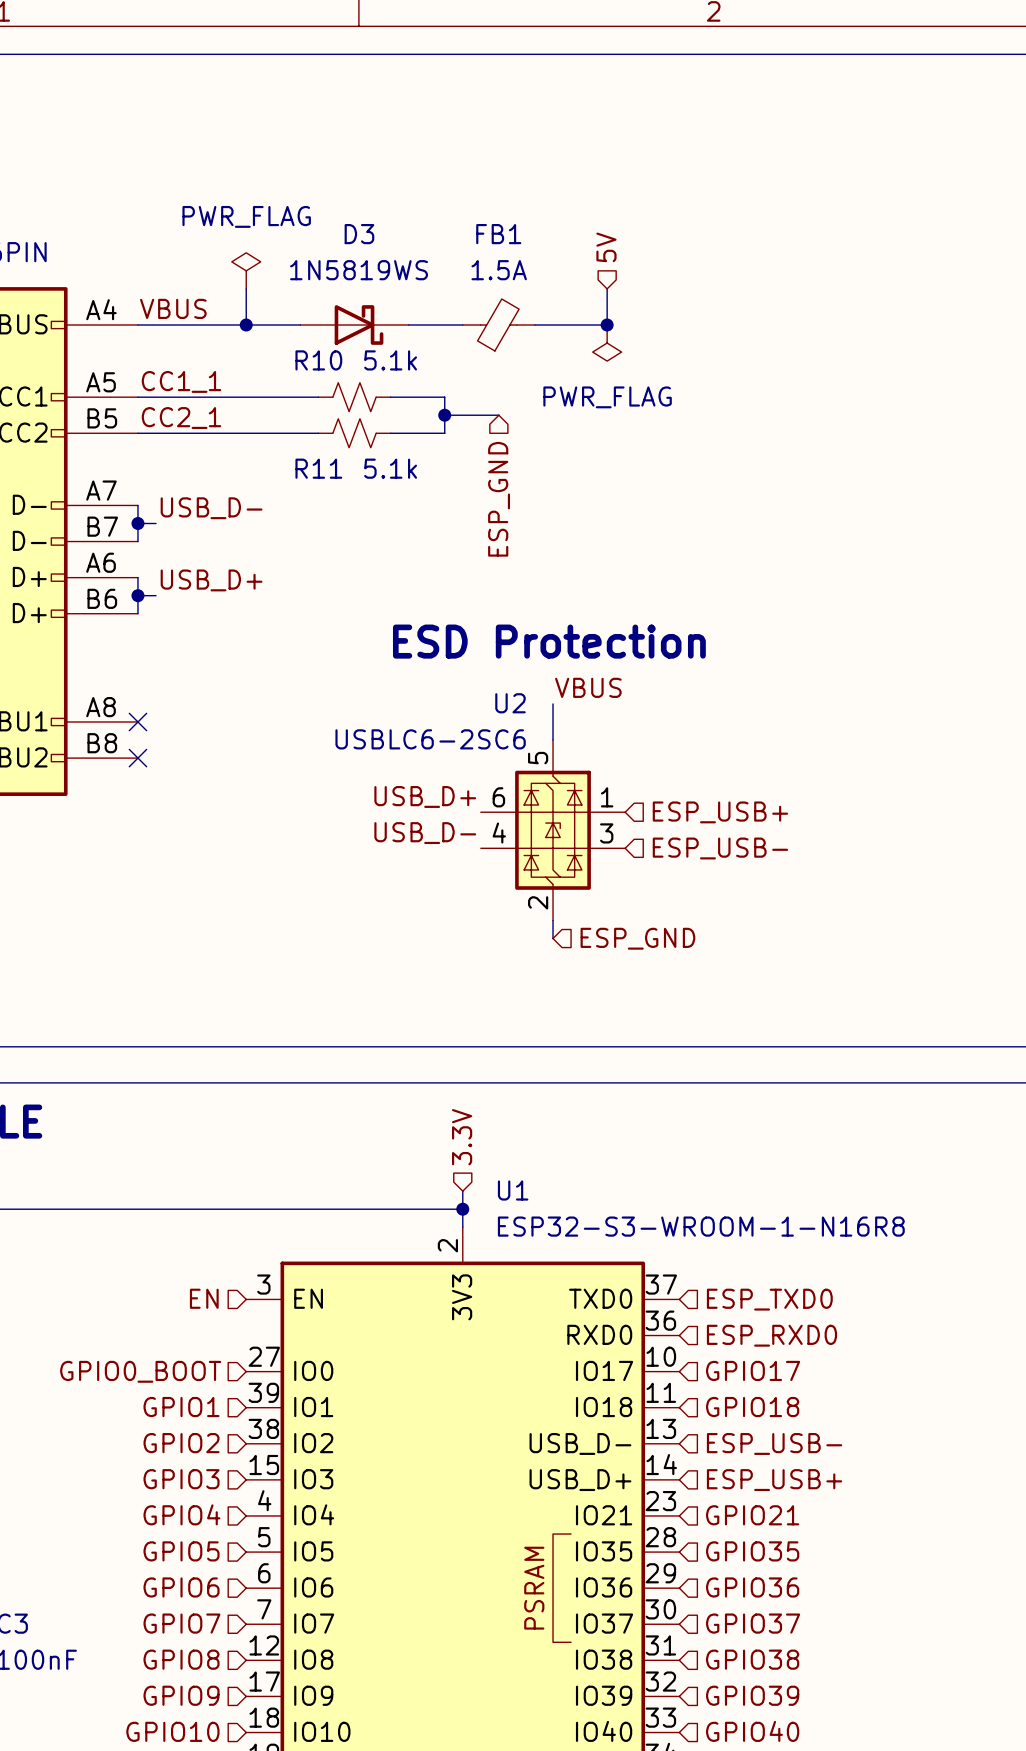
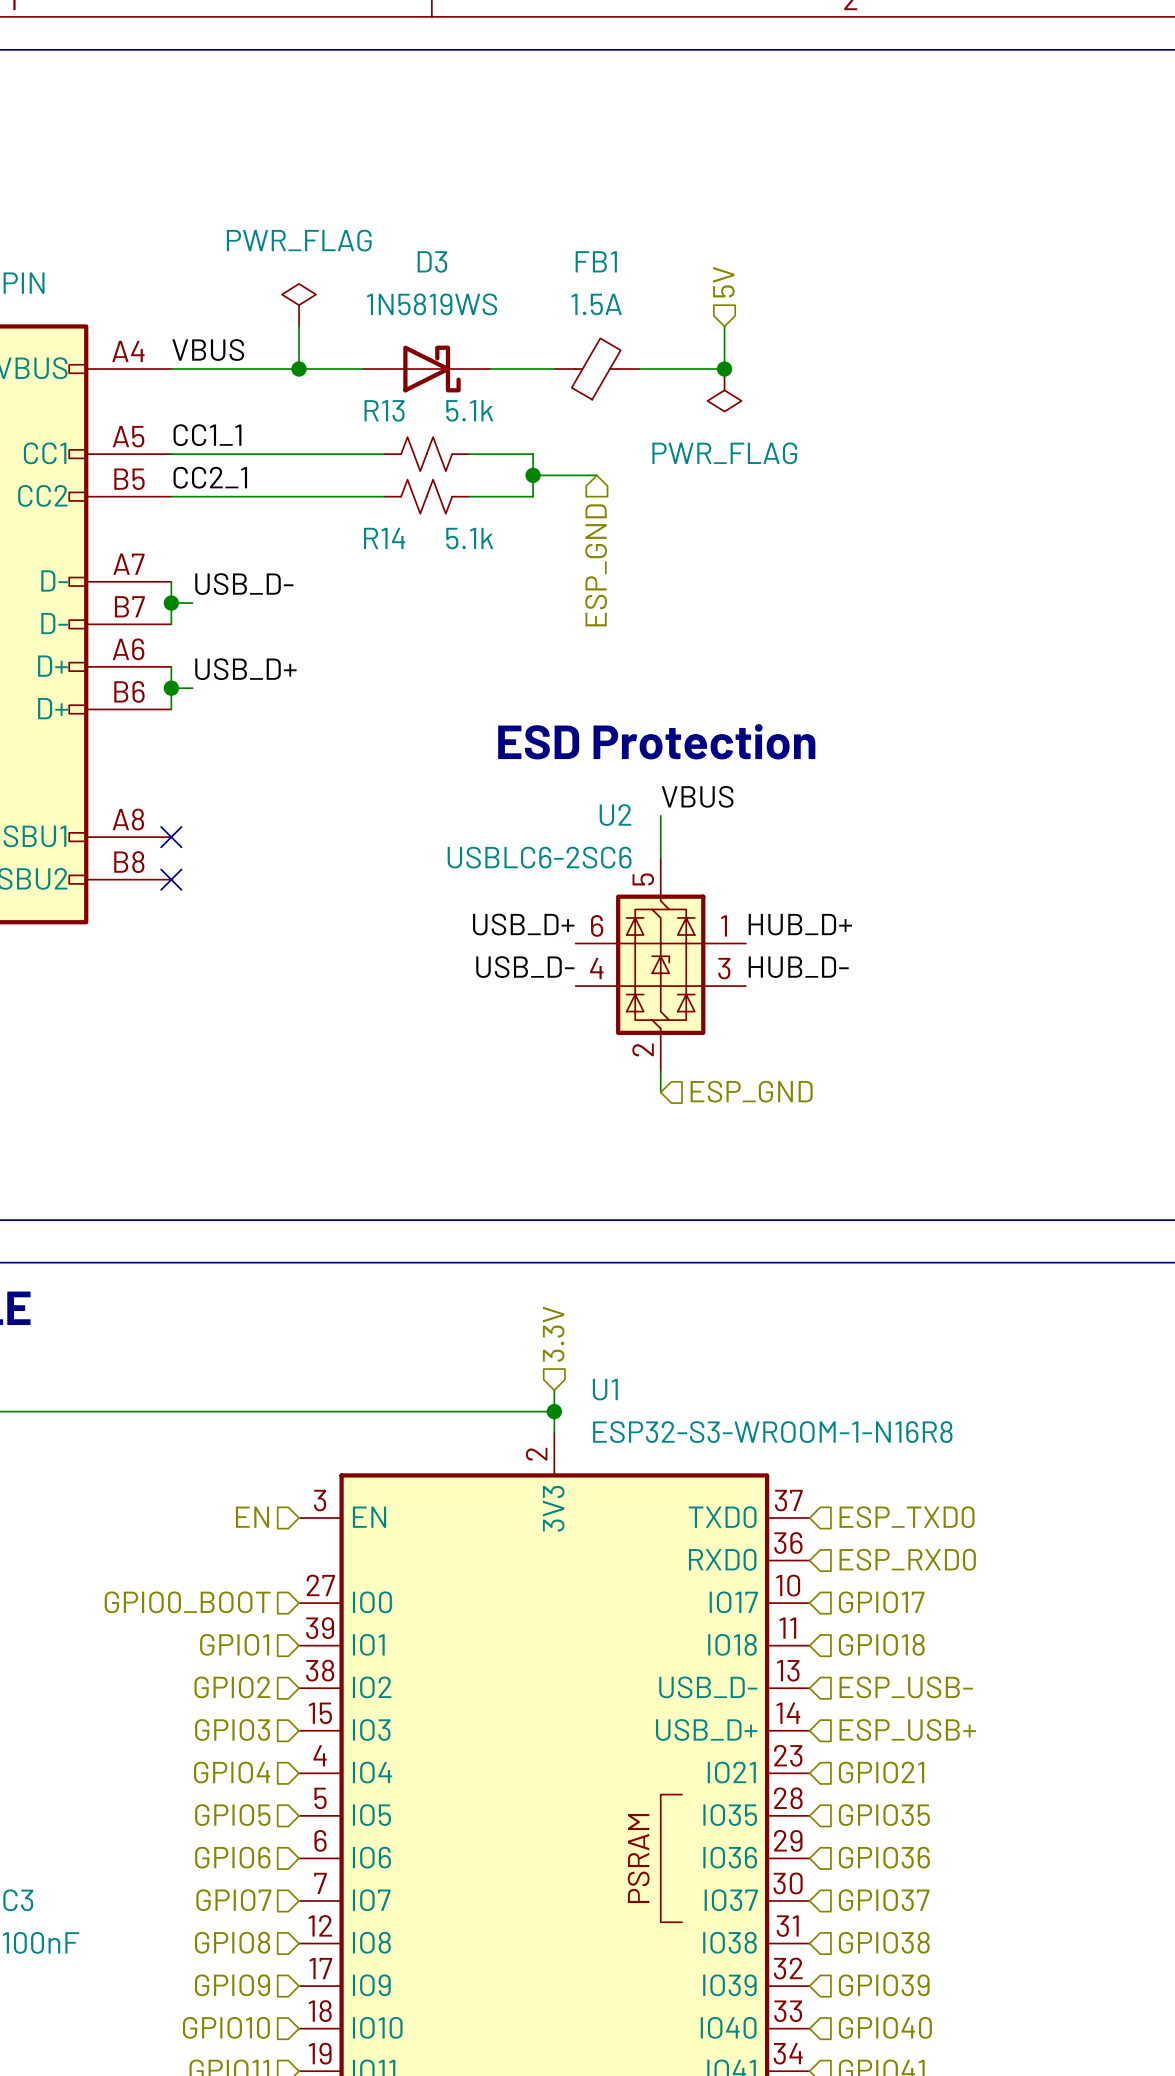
R10 name: R10 (318, 360) -> R13 (384, 410)
R11 name: R11 (318, 468) -> R14 (384, 538)
label: none -> HUB_D+ (800, 924)
hierarchical label: ESP_USB+ (720, 812) -> none
label: none -> HUB_D- (798, 967)
hierarchical label: ESP_USB- (720, 848) -> none

